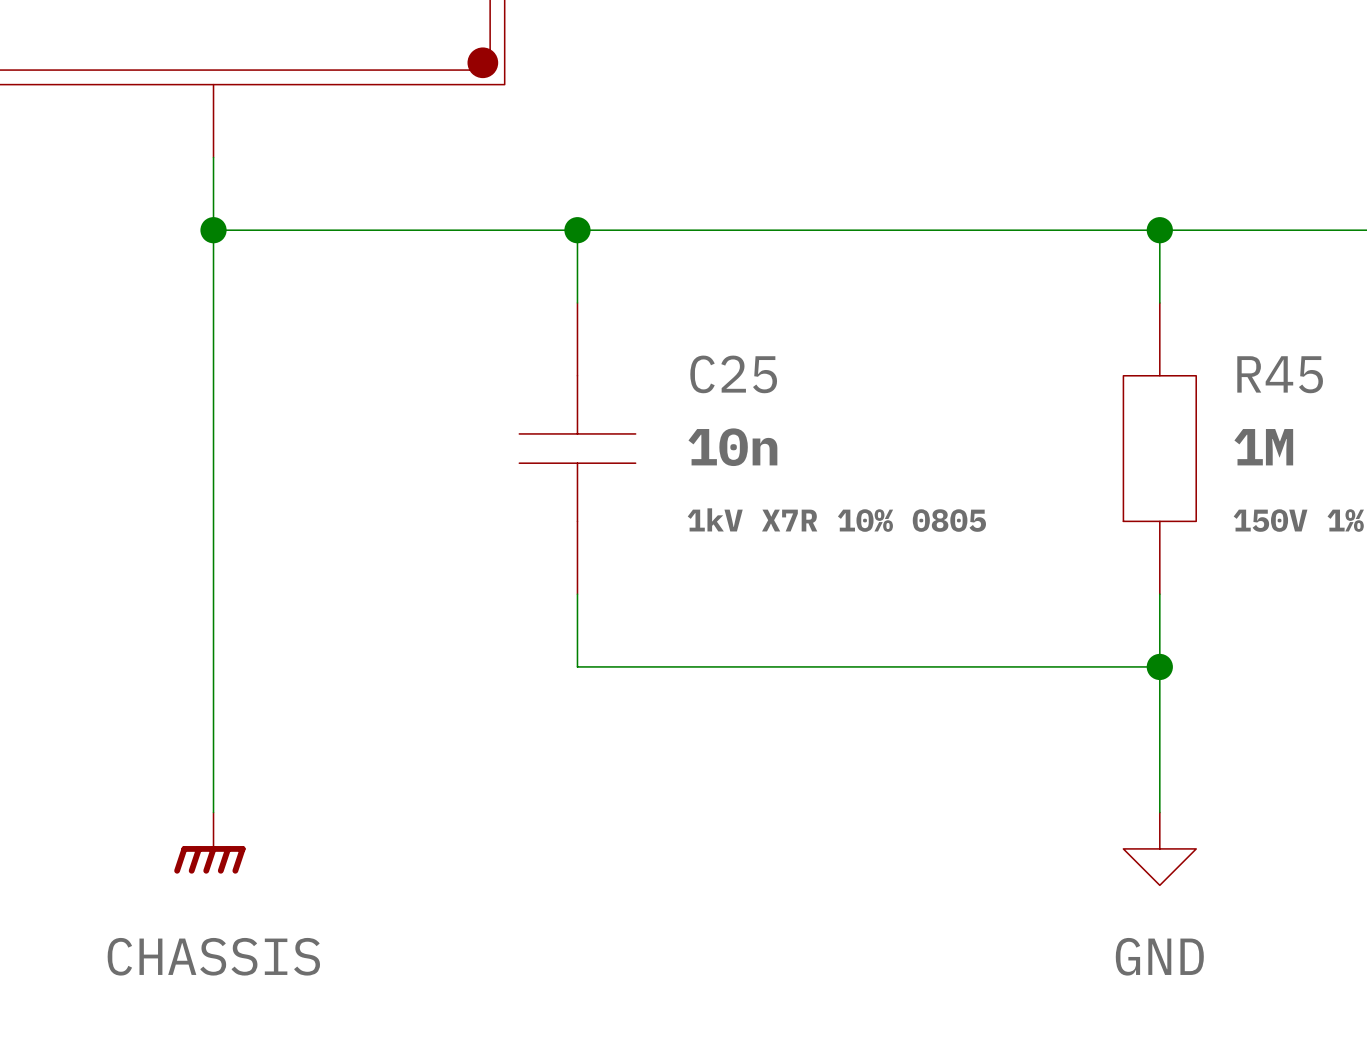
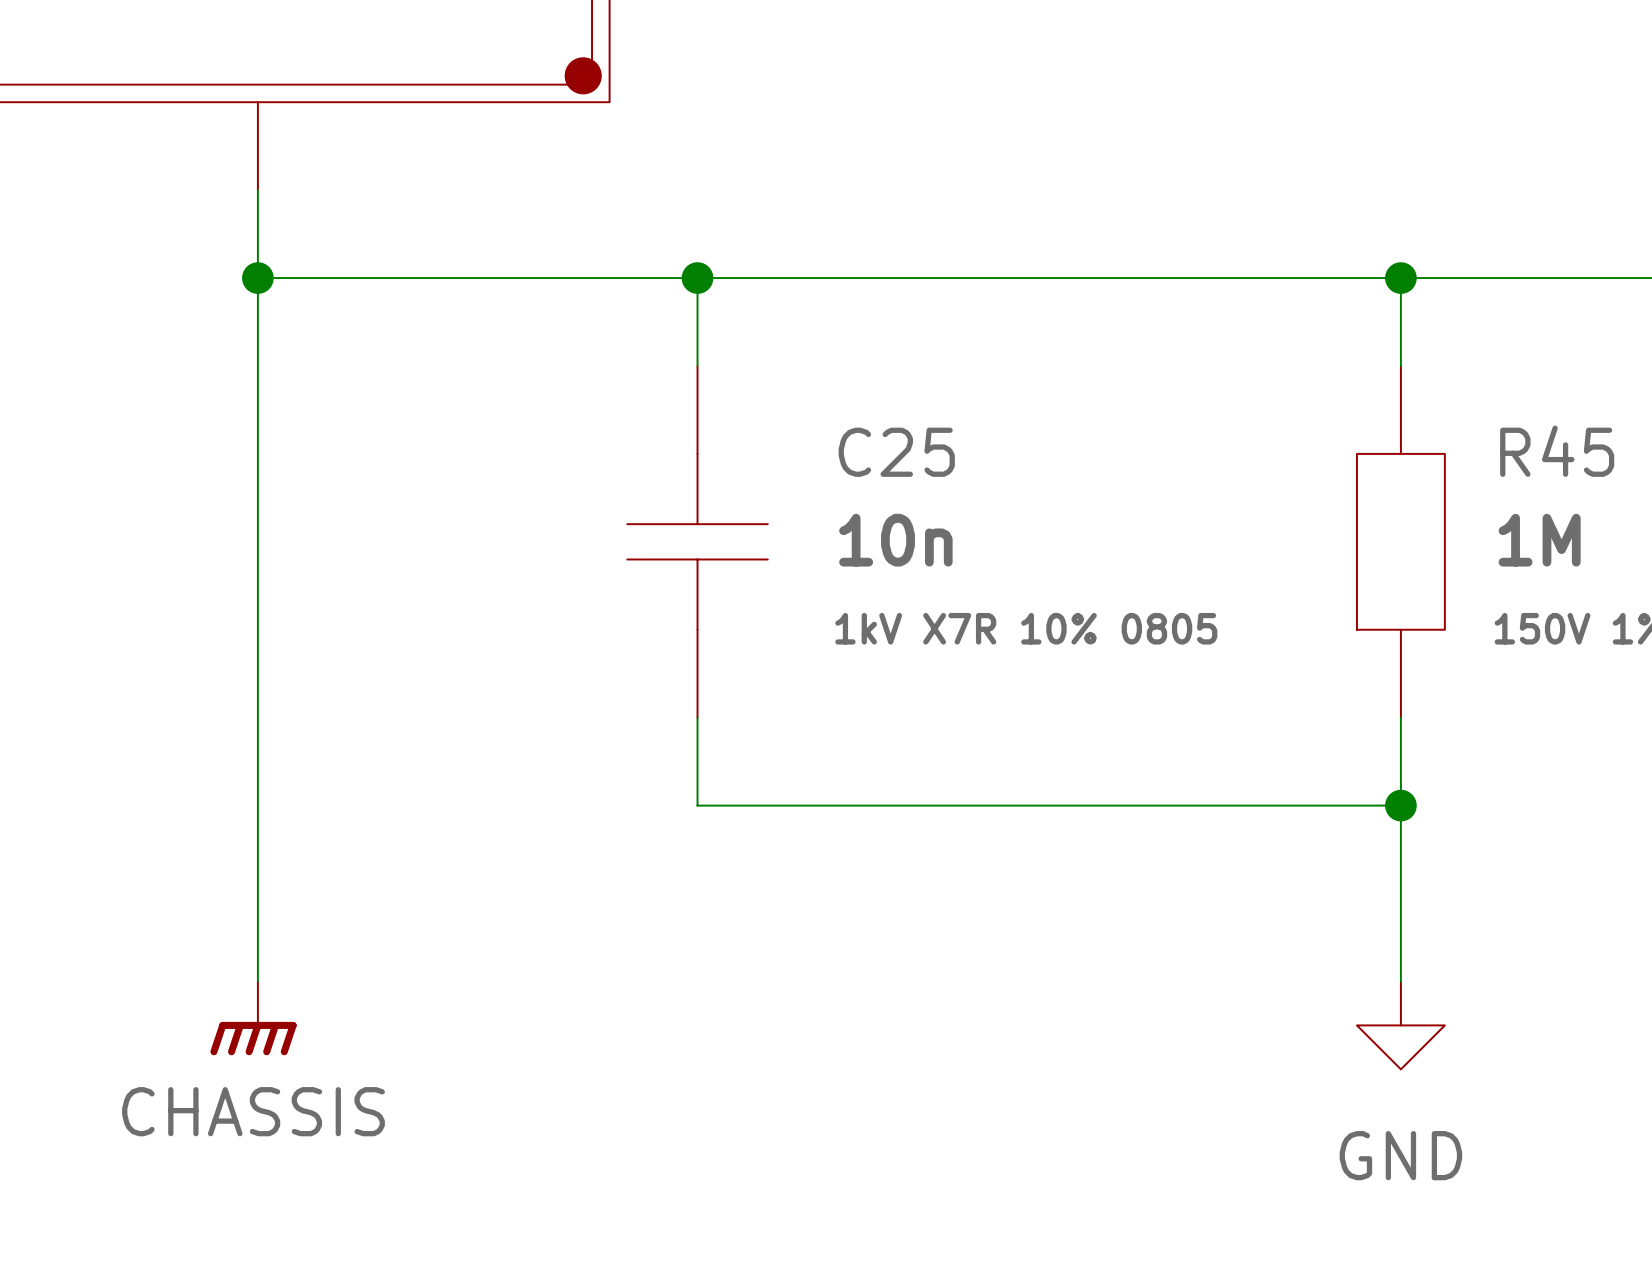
power symbol text position: CHASSIS (213, 956) -> CHASSIS (253, 1111)

